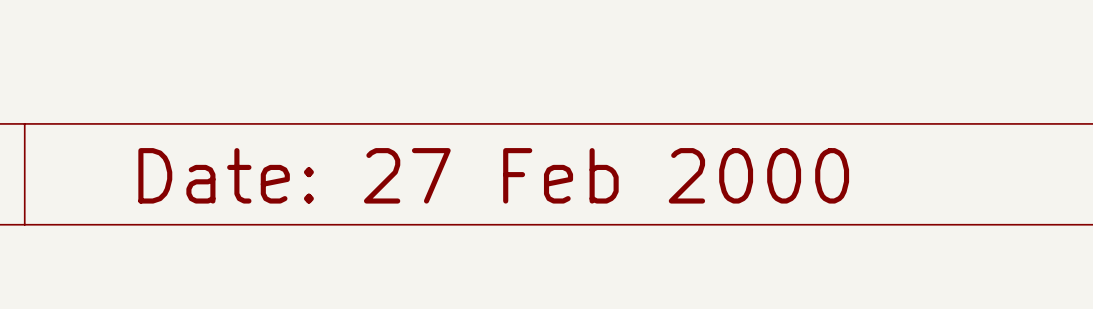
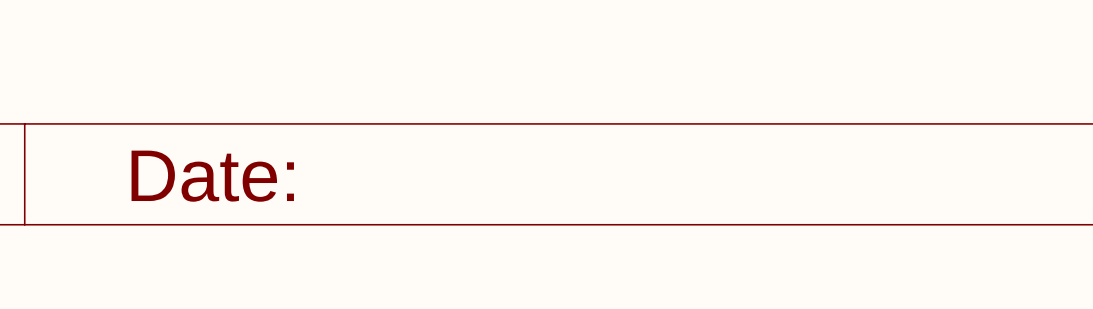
title block: Date: 27 Feb 2000 (493, 175) -> Date: (212, 176)

